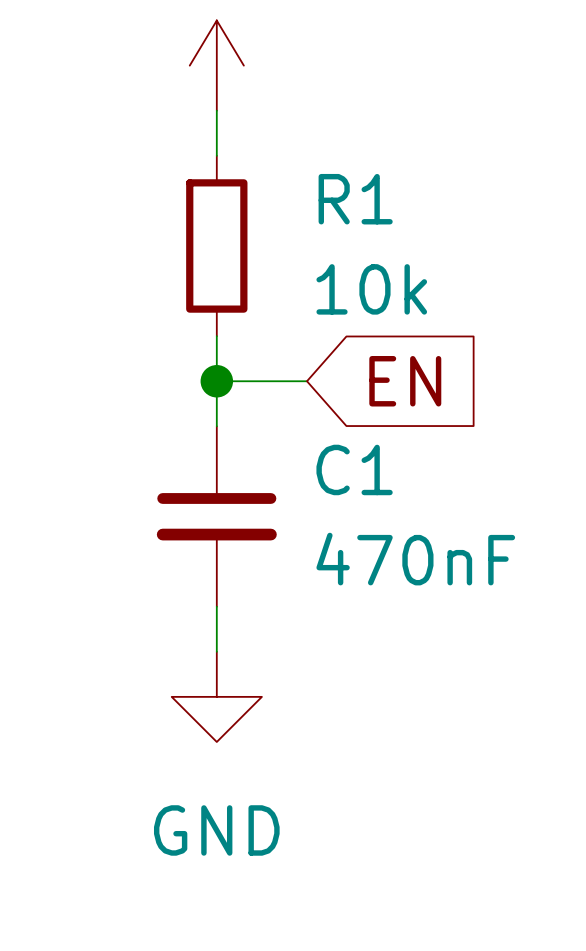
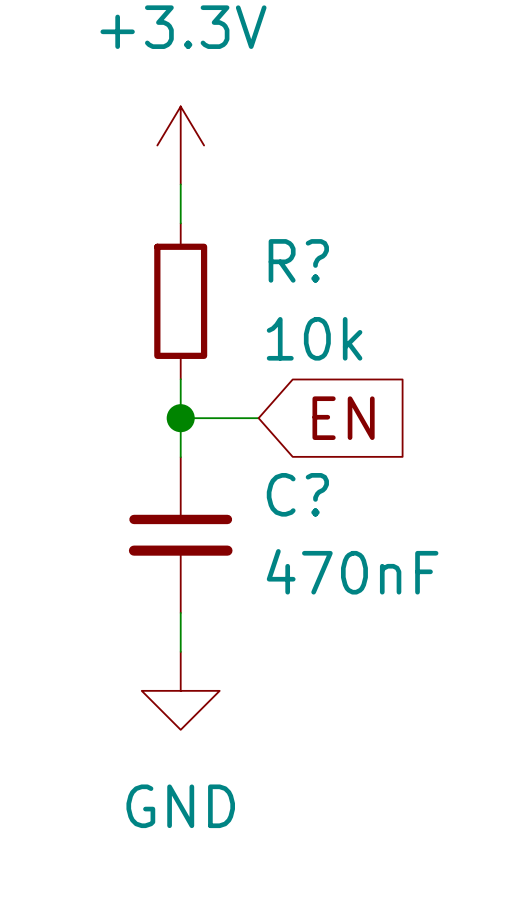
R1 name: R1 (355, 199) -> R? (298, 260)
C1 name: C1 (354, 469) -> C? (297, 494)

